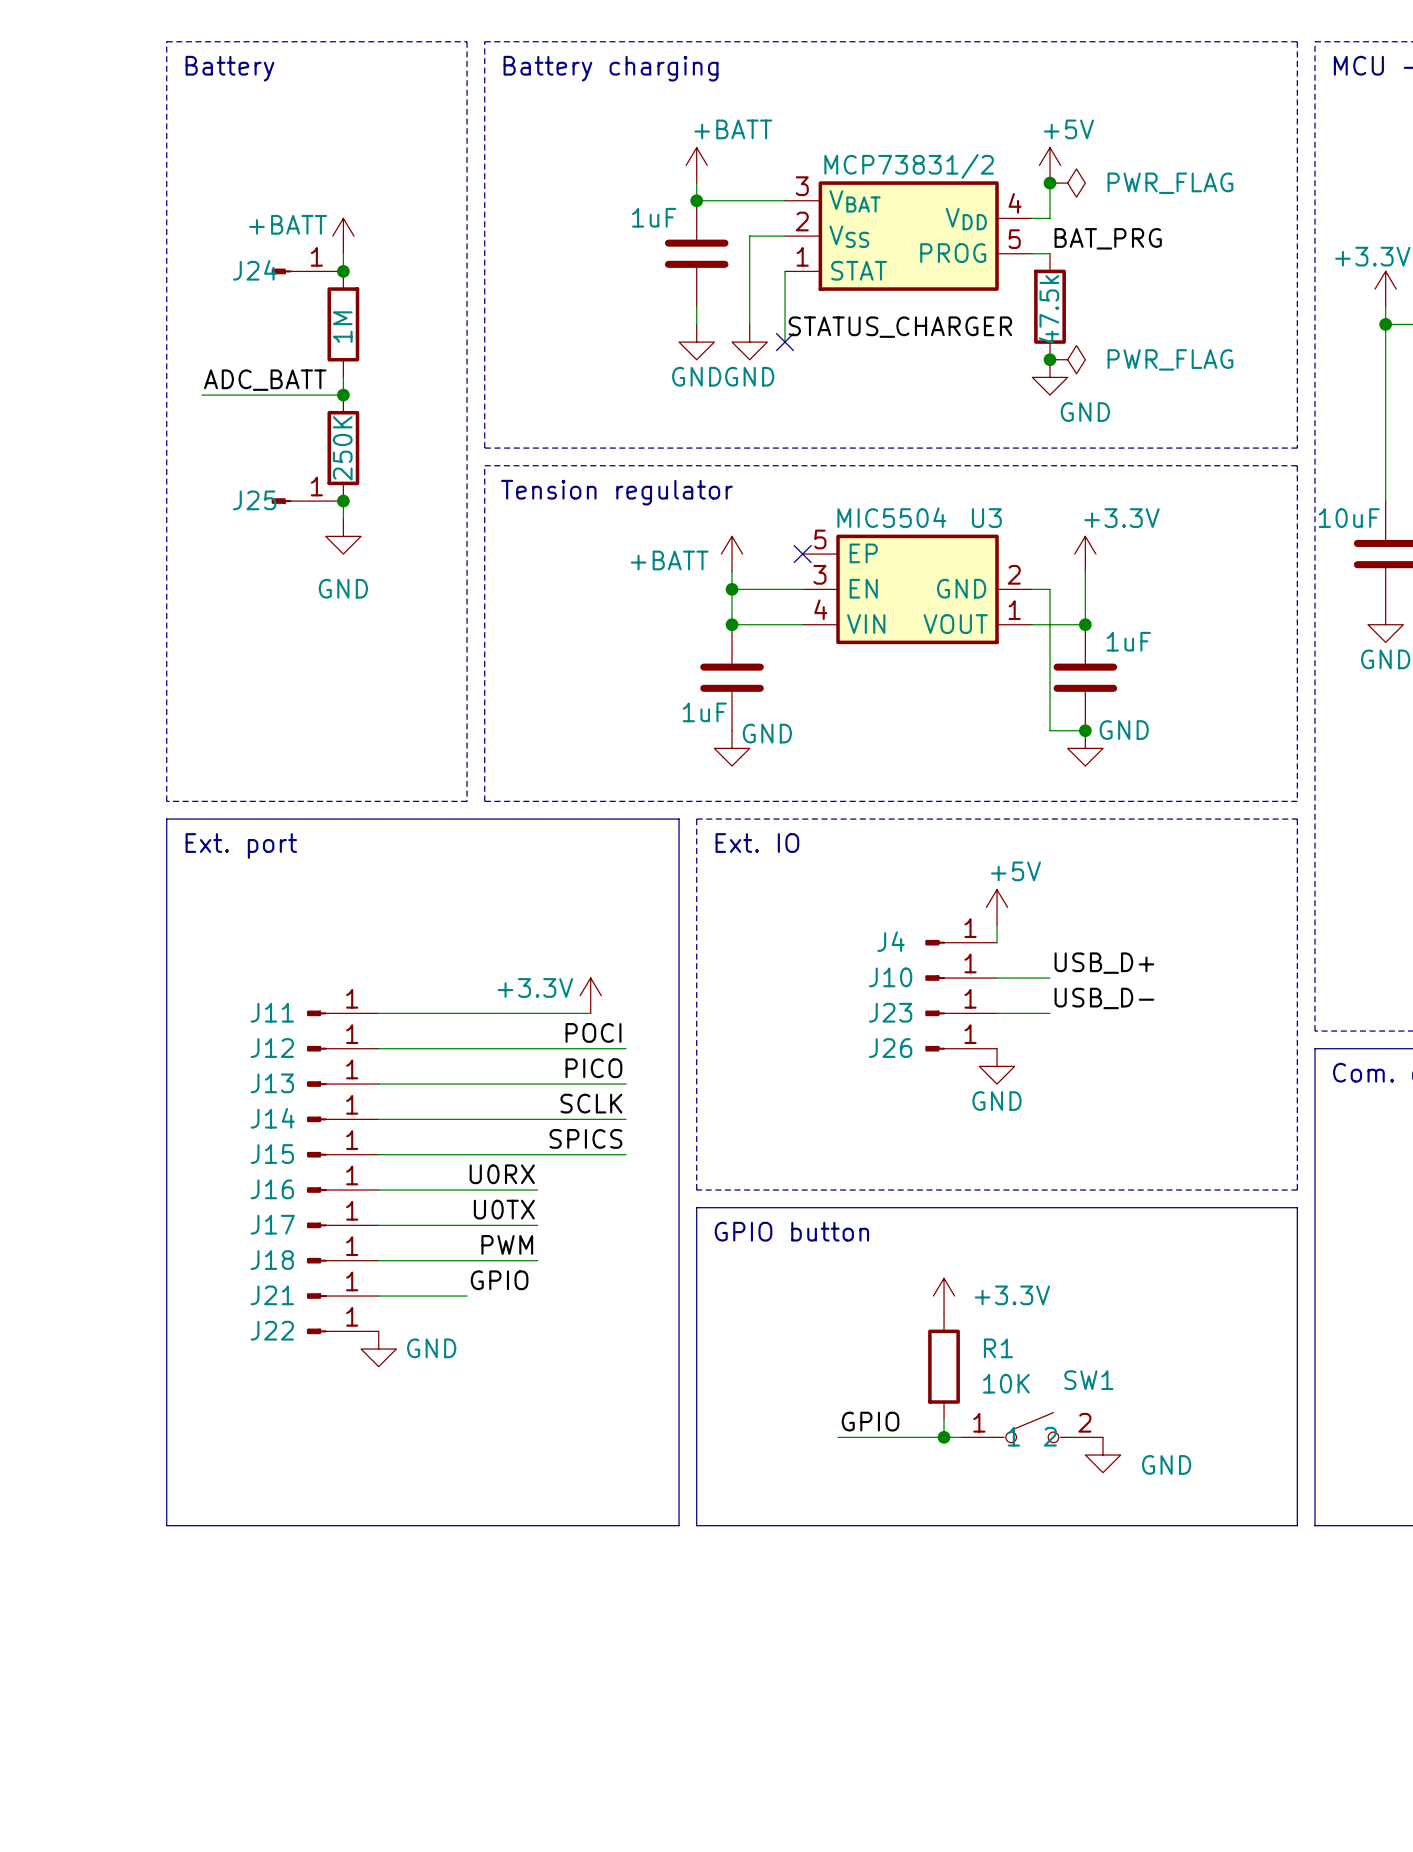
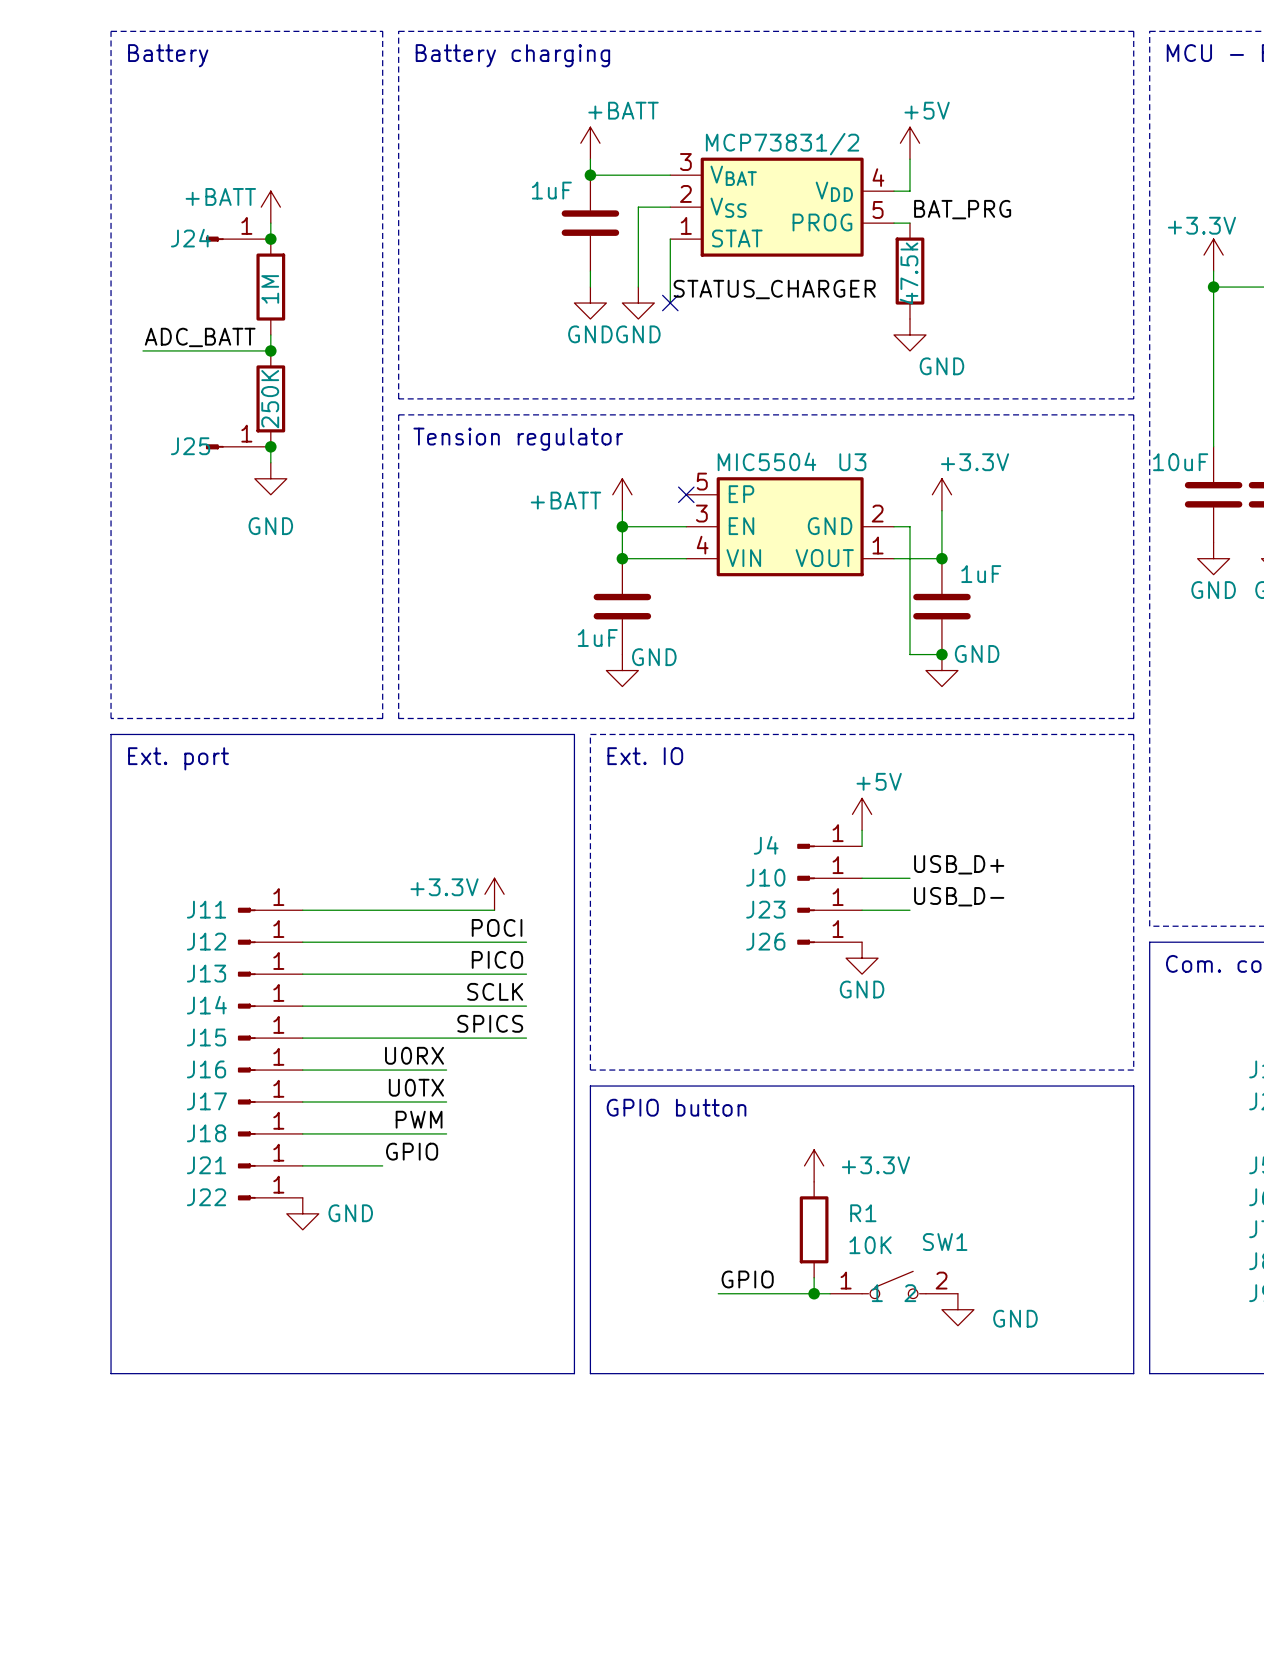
junction: (1050, 183) -> none
power symbol: PWR_FLAG (1067, 183) -> none
junction: (1050, 359) -> none
power symbol: PWR_FLAG (1067, 359) -> none

